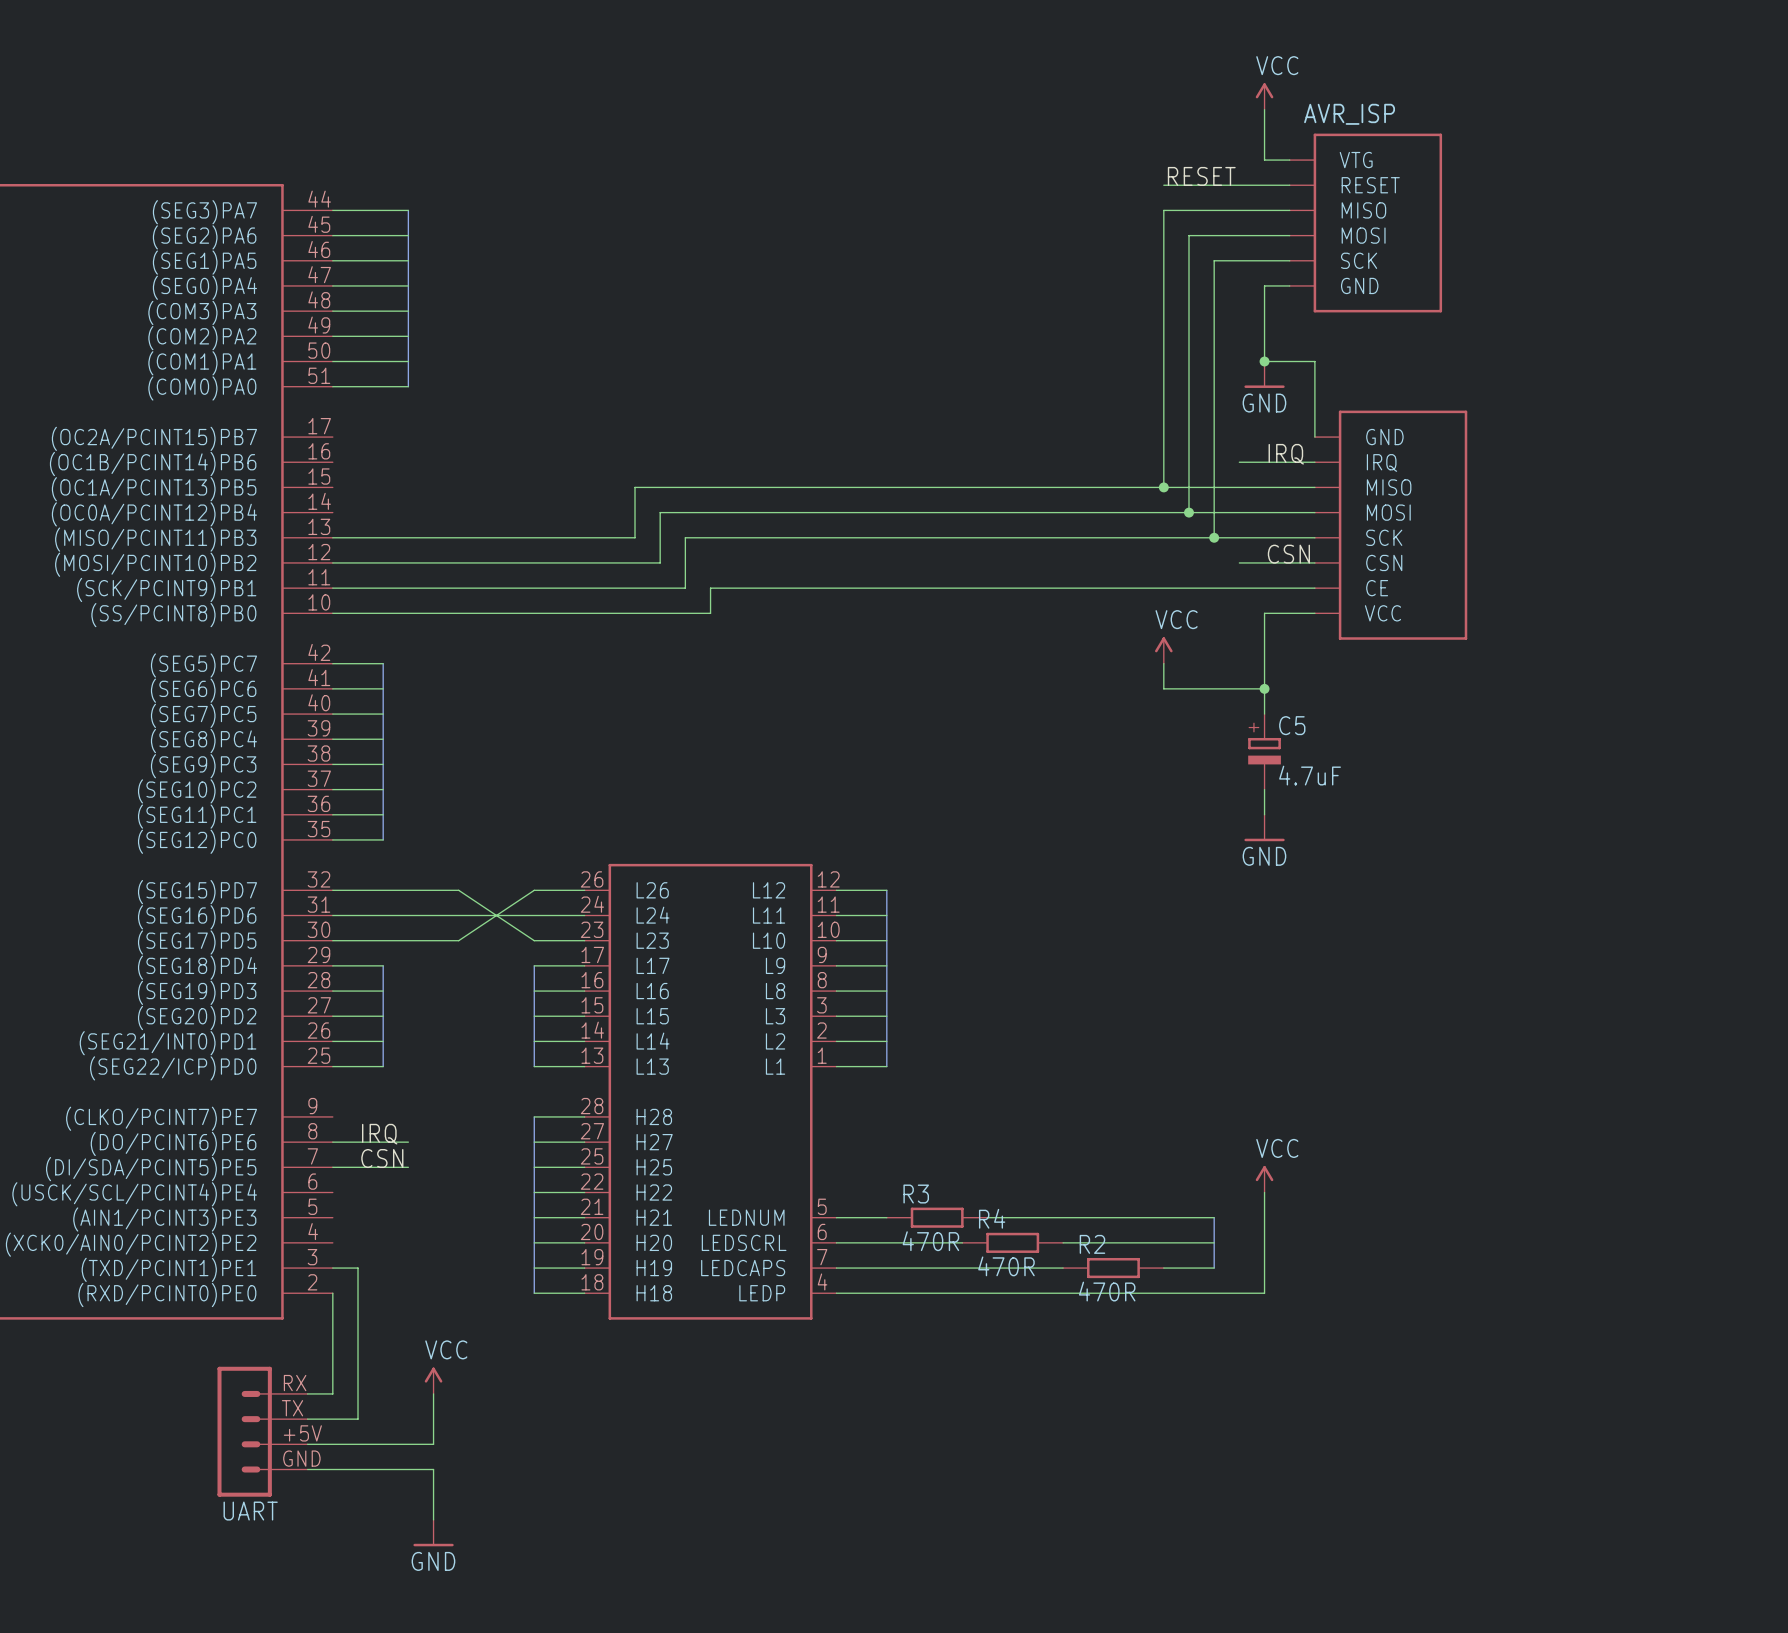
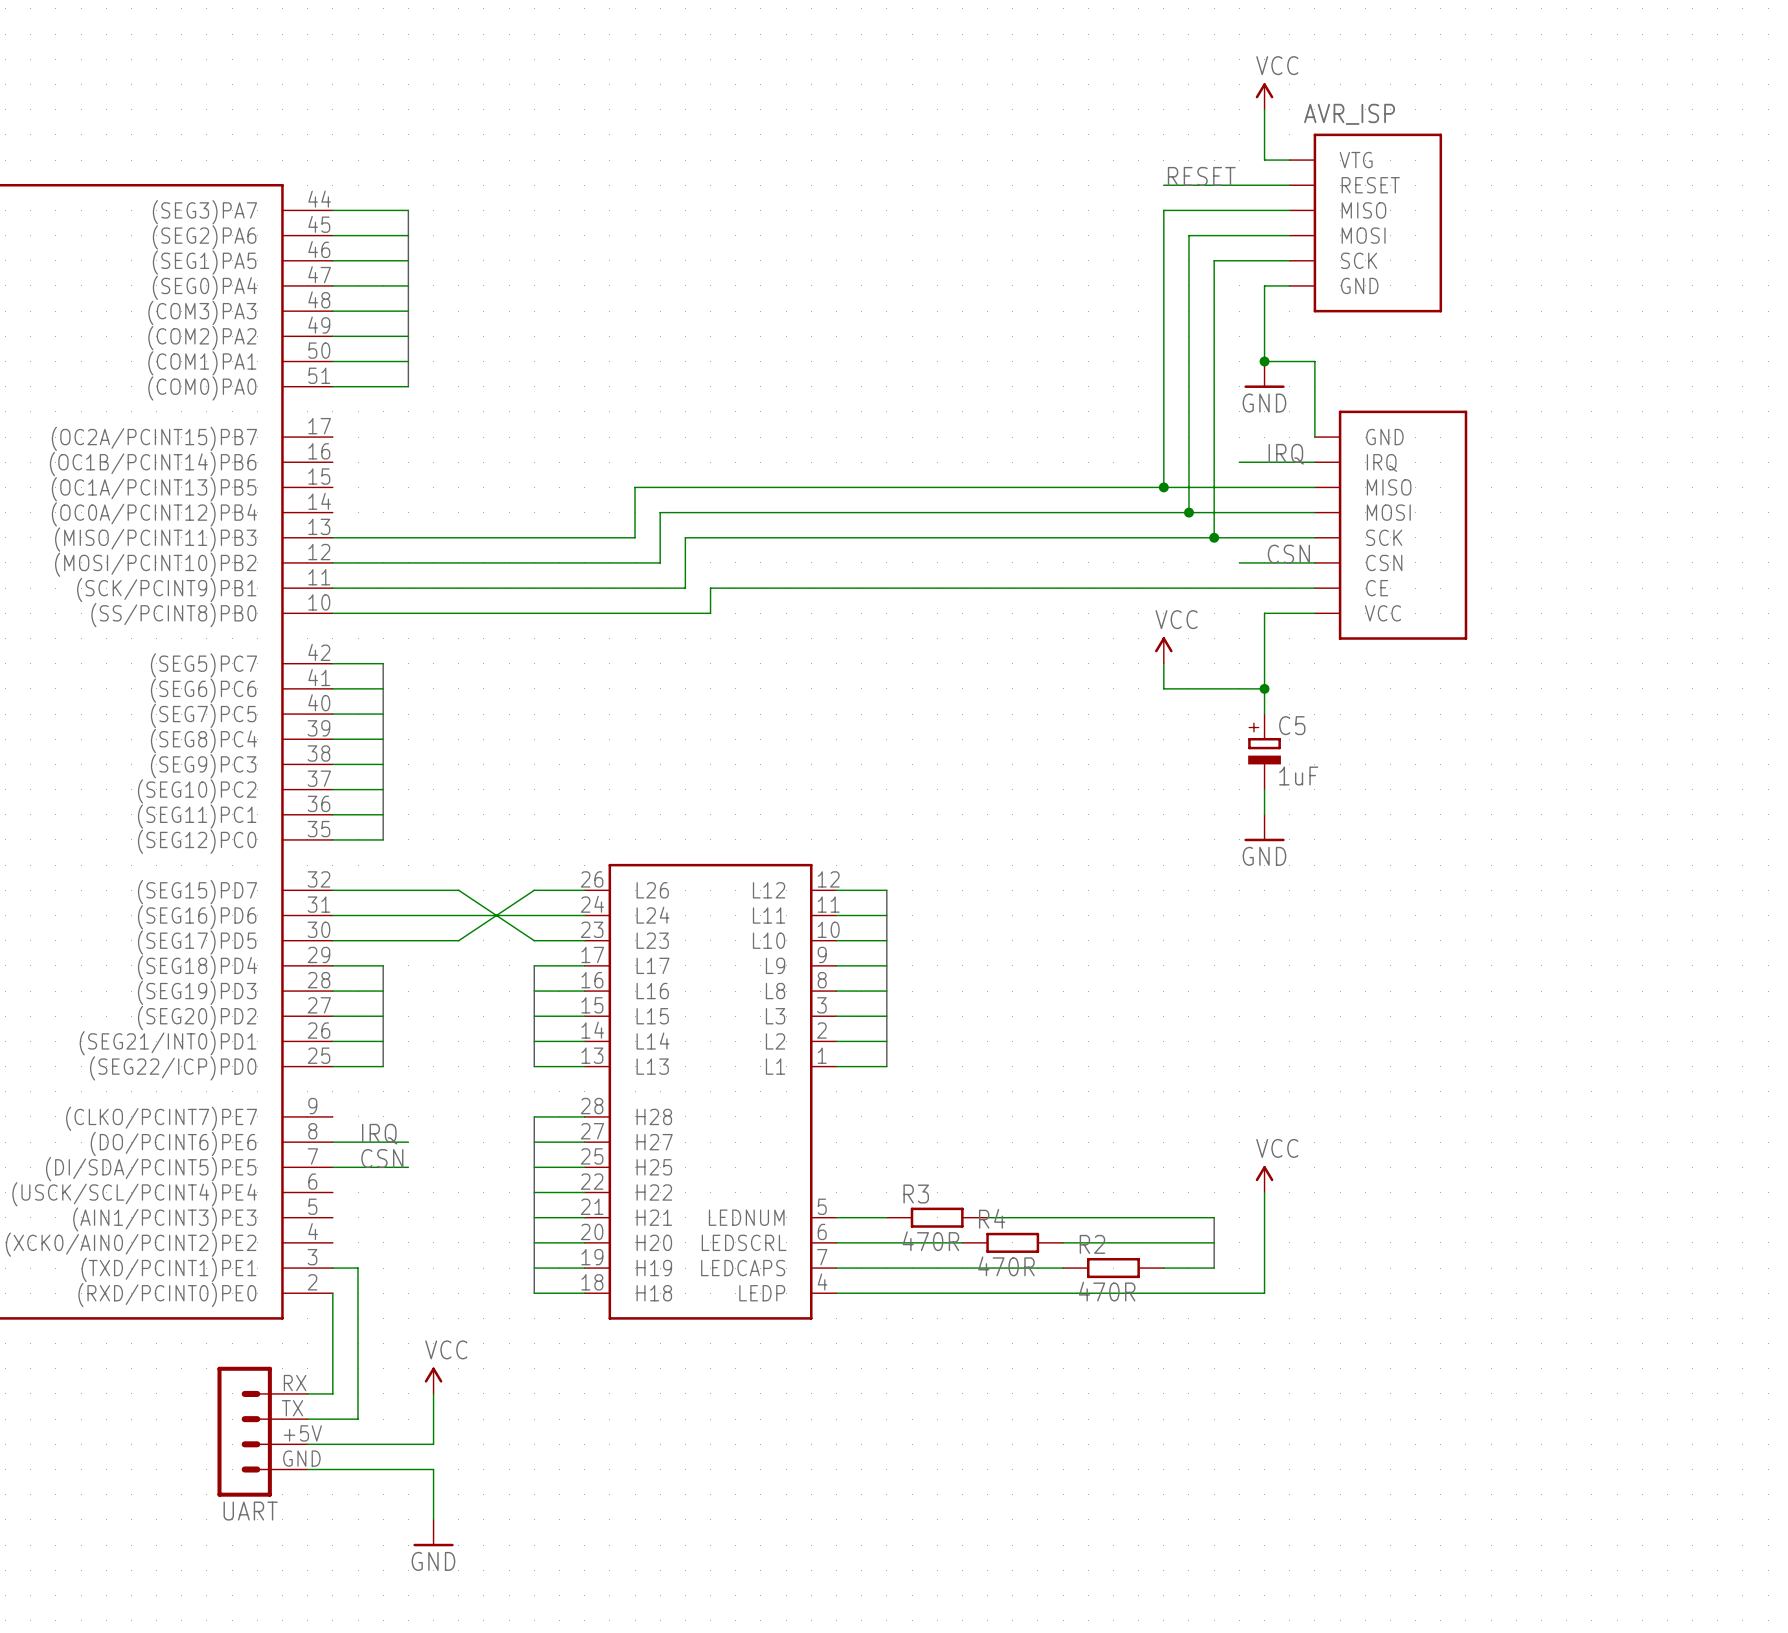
C5 value: 4.7uF (1310, 775) -> 1uF (1298, 776)

